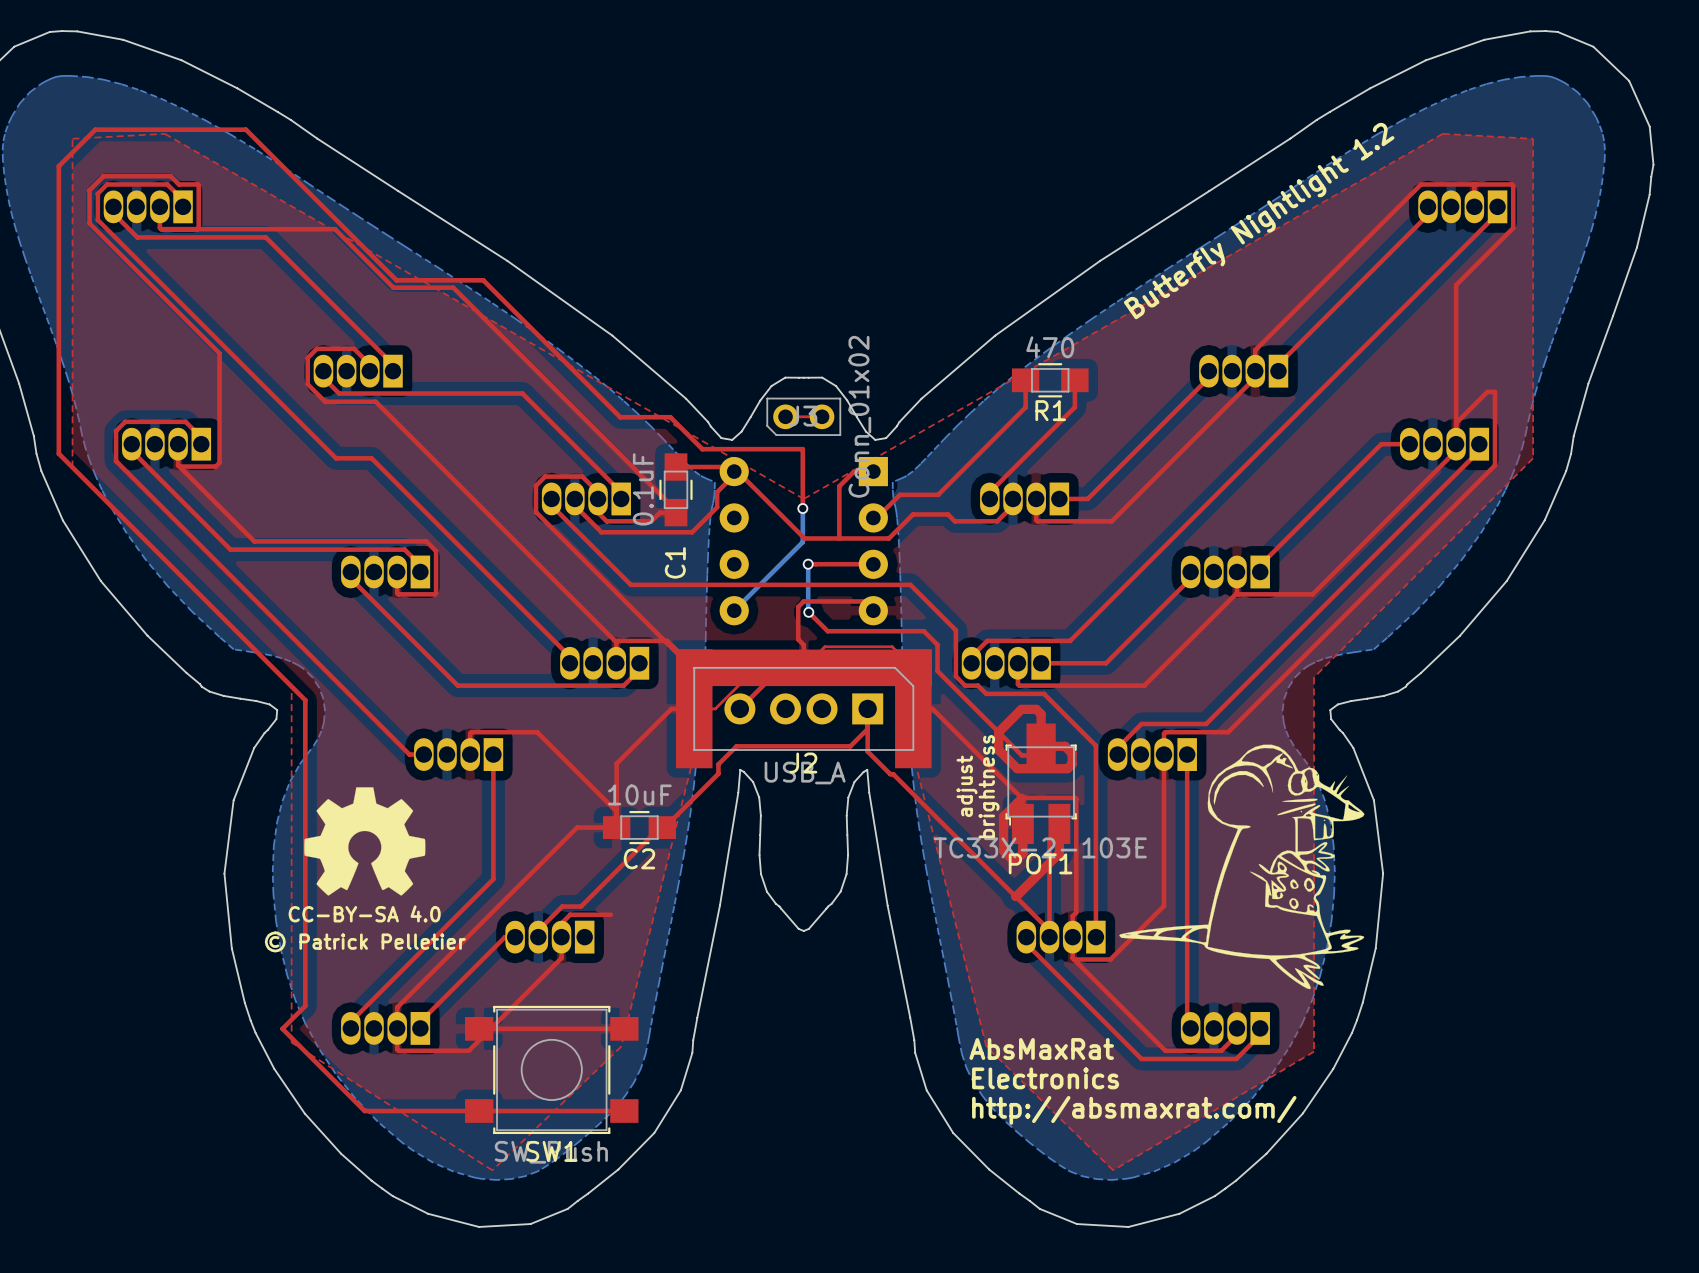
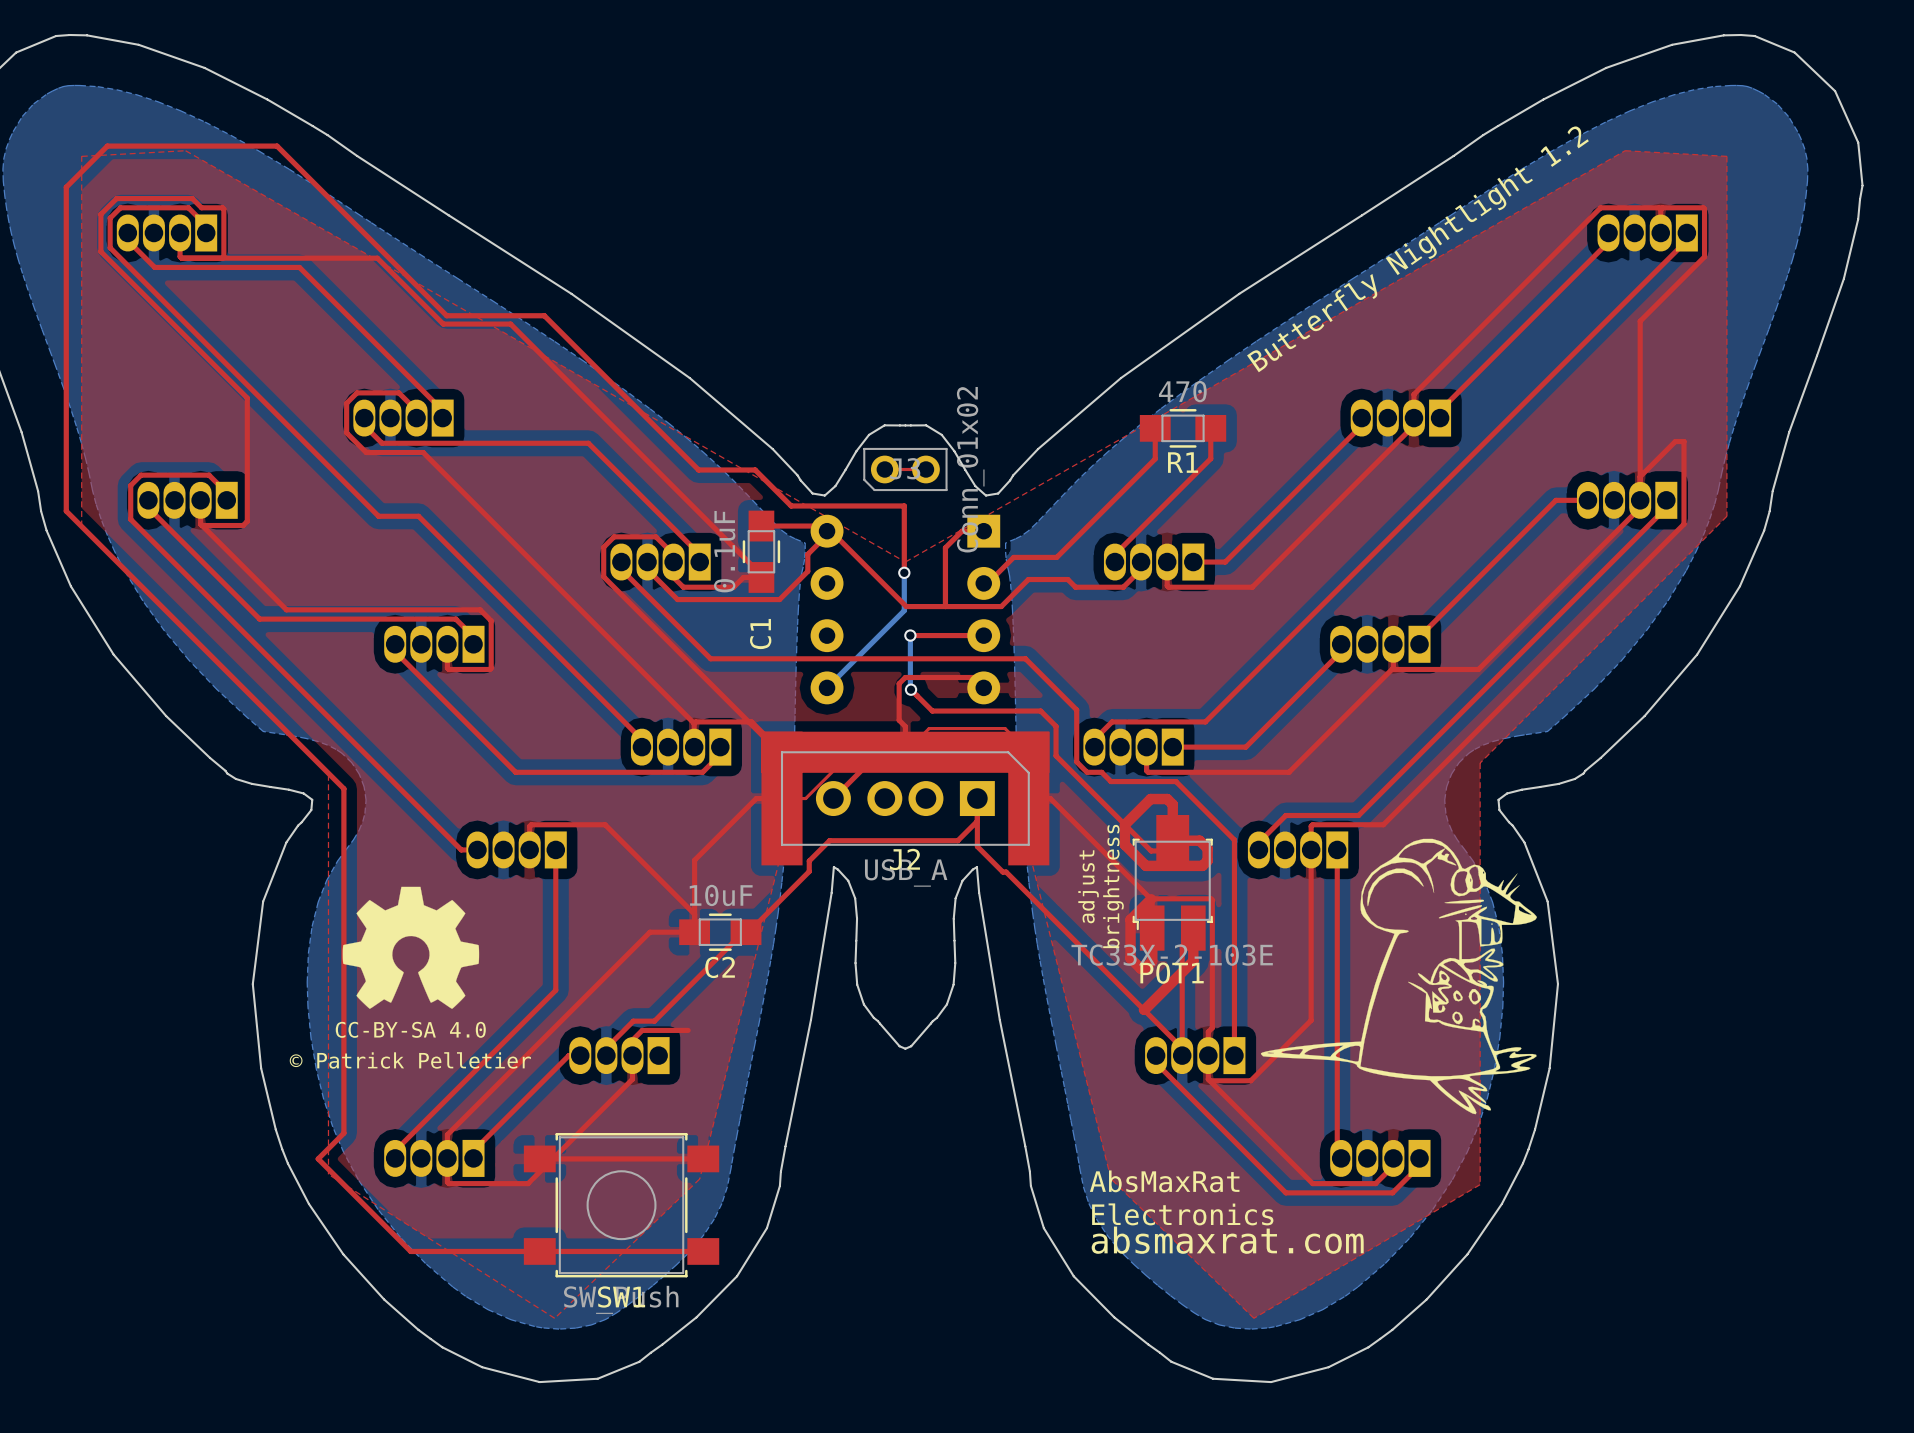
text: http://absmaxrat.com/ (1134, 1110) -> absmaxrat.com (1227, 1240)

